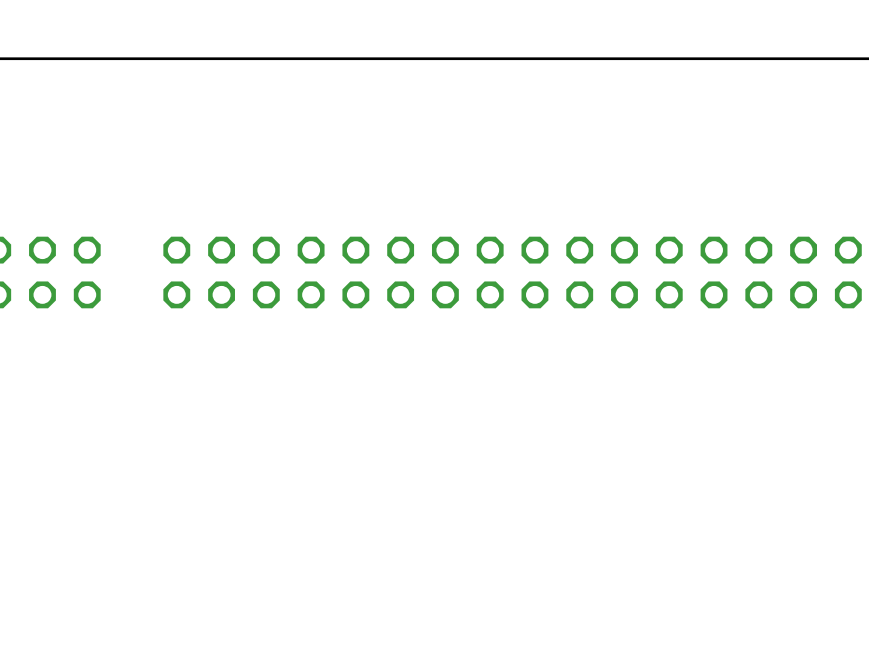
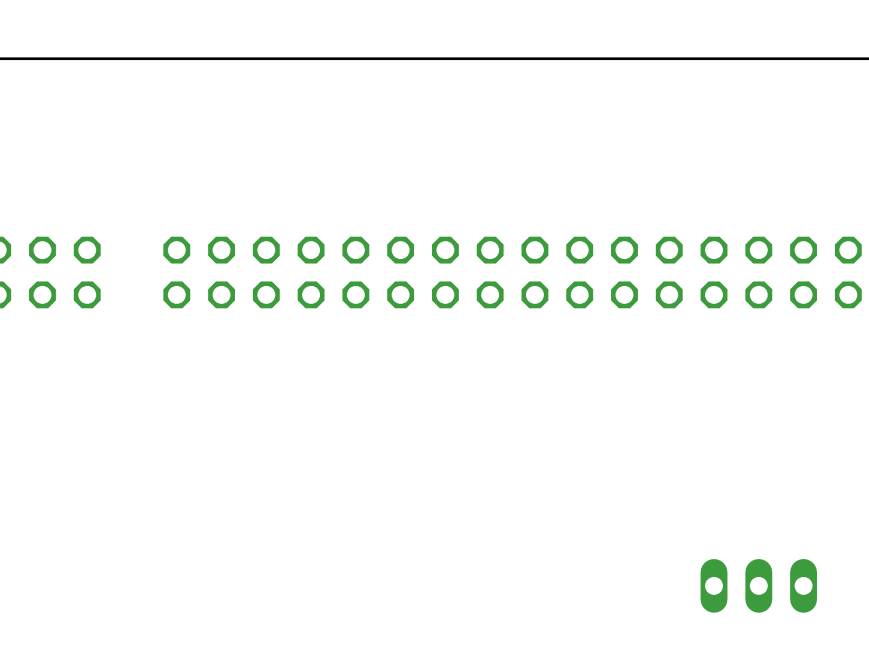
part: none -> (758, 585)

